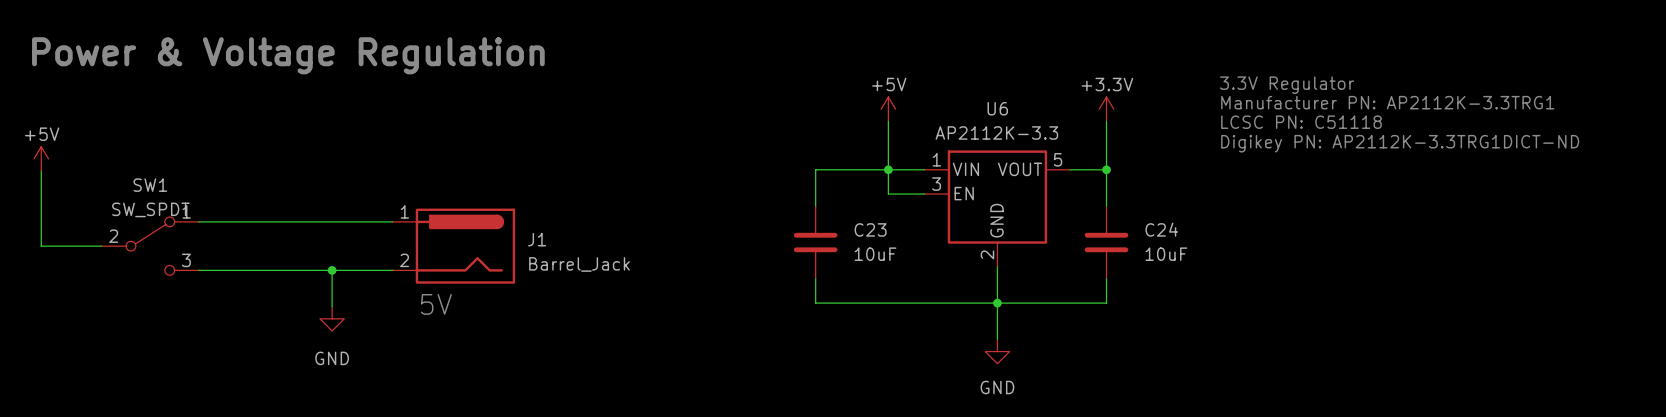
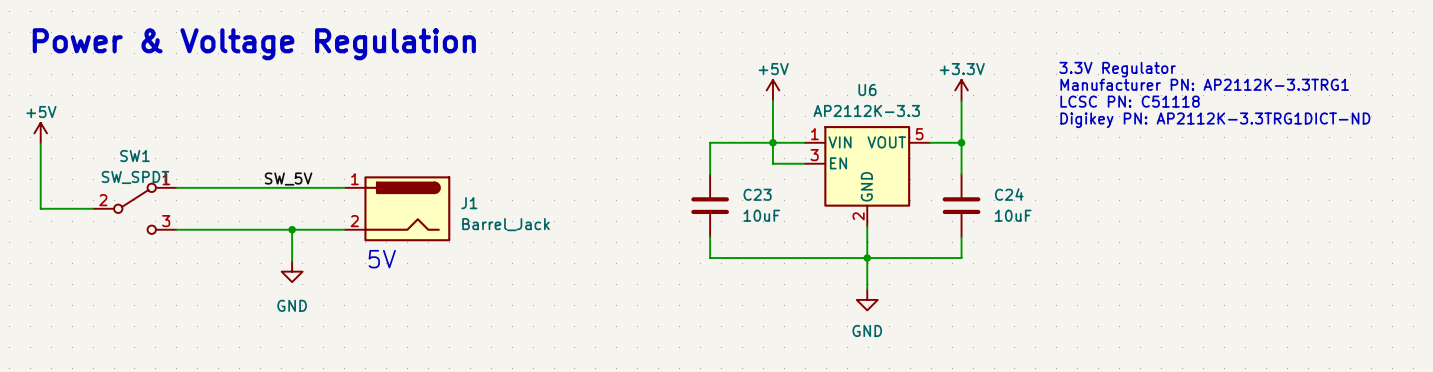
label: none -> SW_5V (288, 178)

